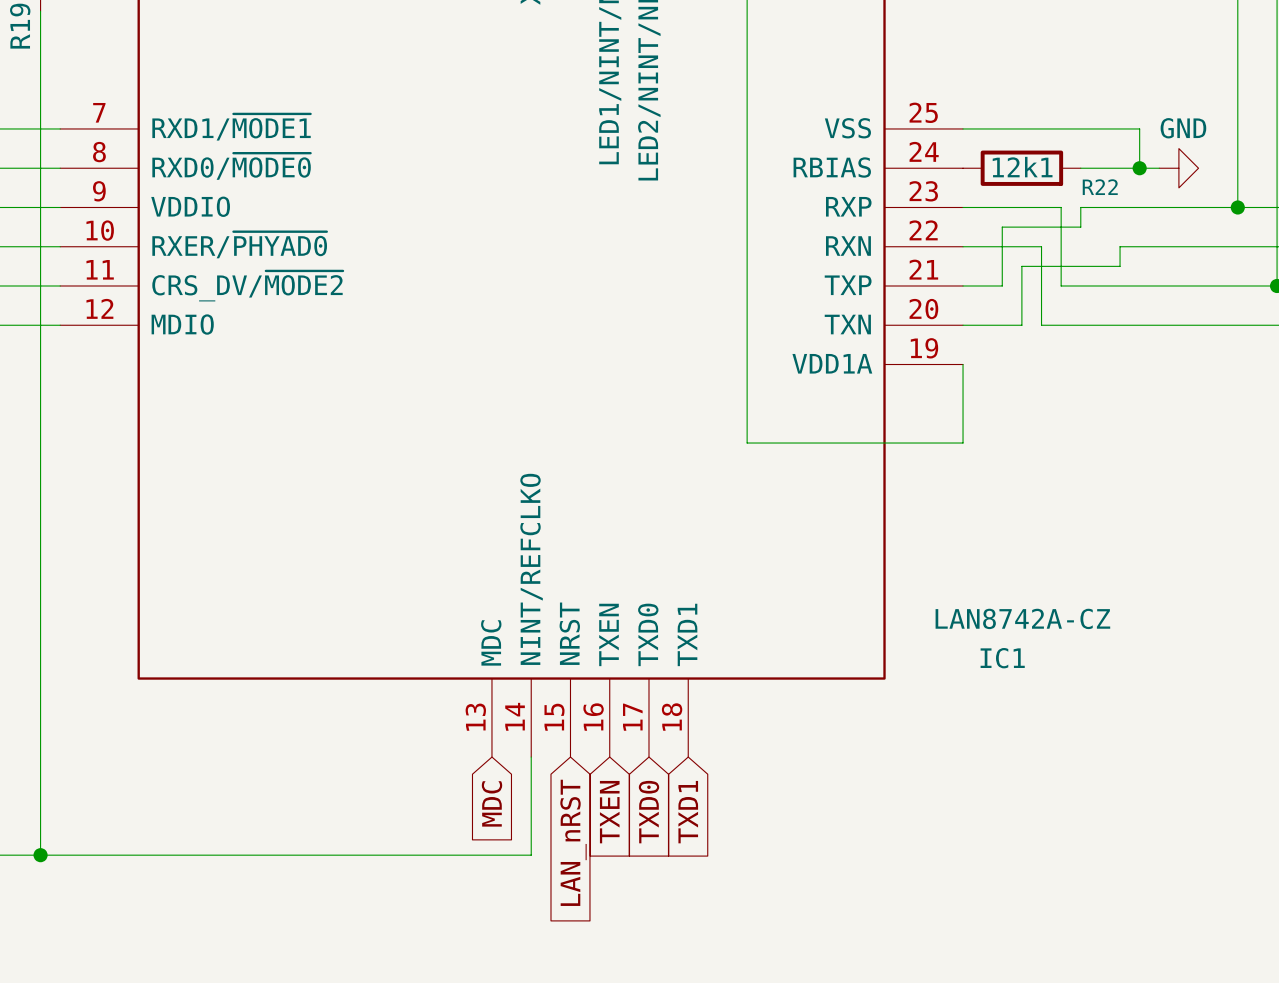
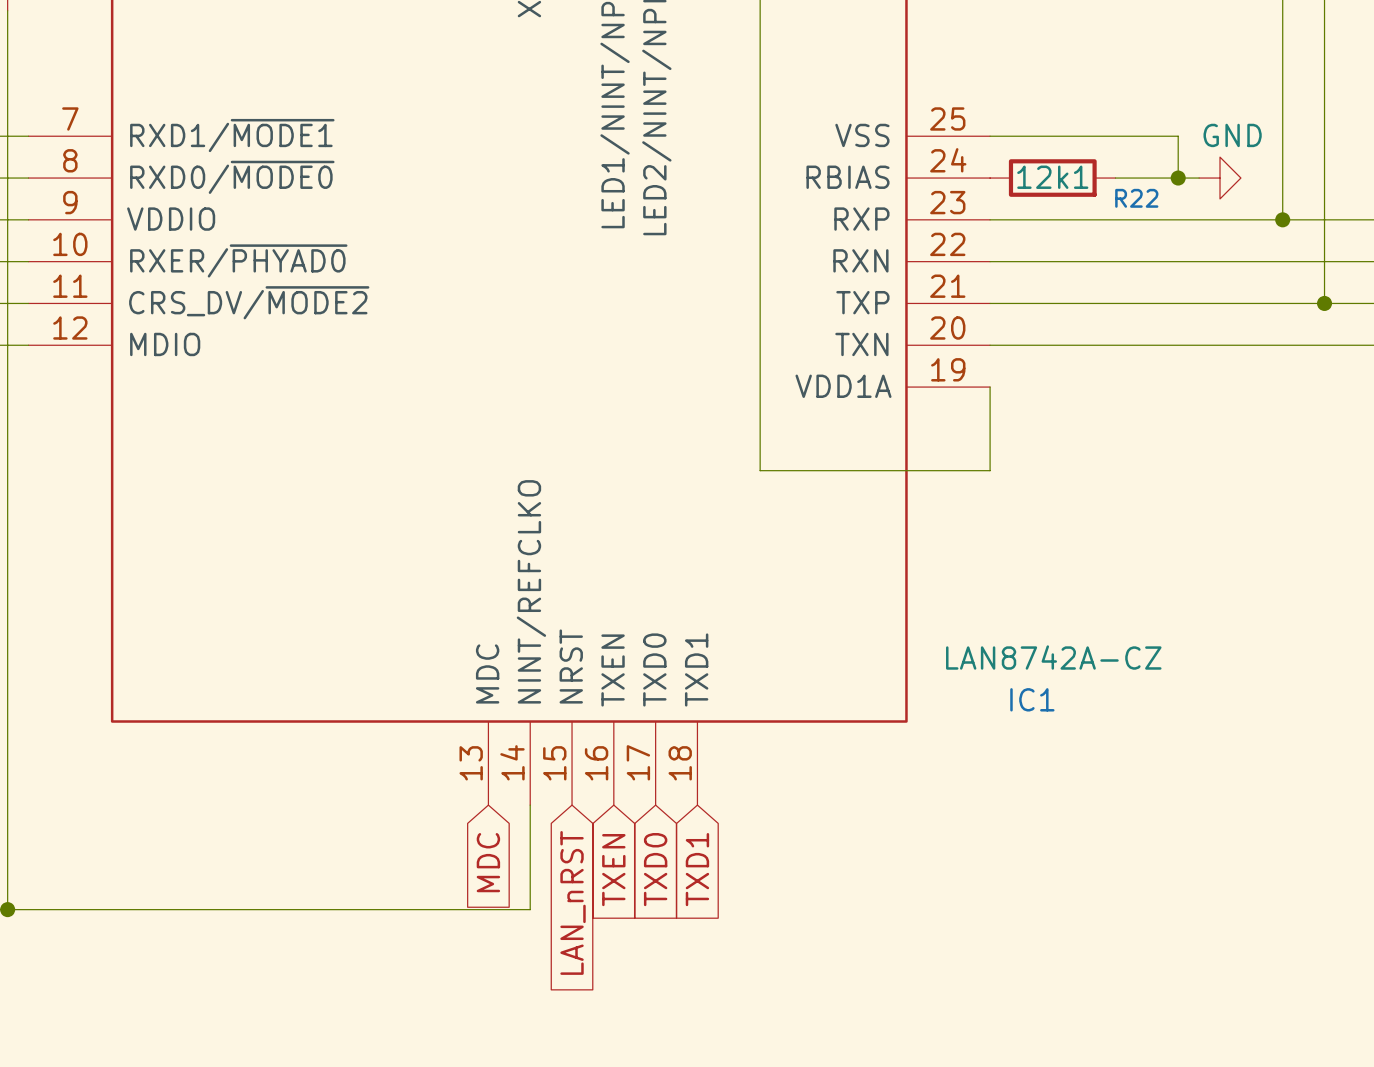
wire: (1061, 207) (1061, 285) -> (1094, 219) (1115, 219)
wire: (1080, 207) (1080, 227) (1002, 227) (1002, 285) -> (1094, 303) (1031, 303)
wire: (1041, 246) (1041, 325) -> (1052, 345) (1073, 345)
wire: (1120, 246) (1120, 266) (1021, 266) (1021, 325) -> (1157, 261) (1073, 261)

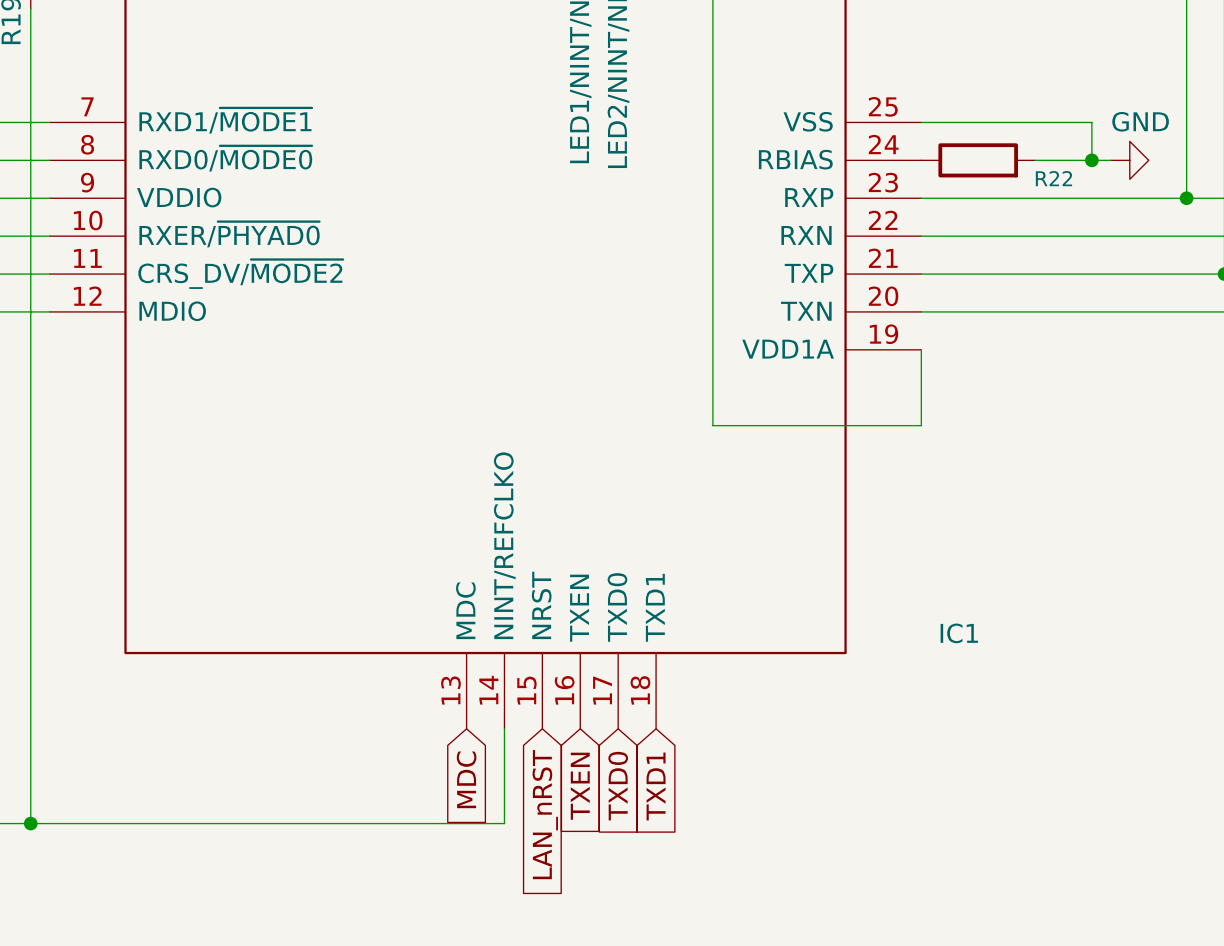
R22 value: 12k1 (1052, 177) -> none
IC1 value: LAN8742A-CZ (1053, 657) -> none

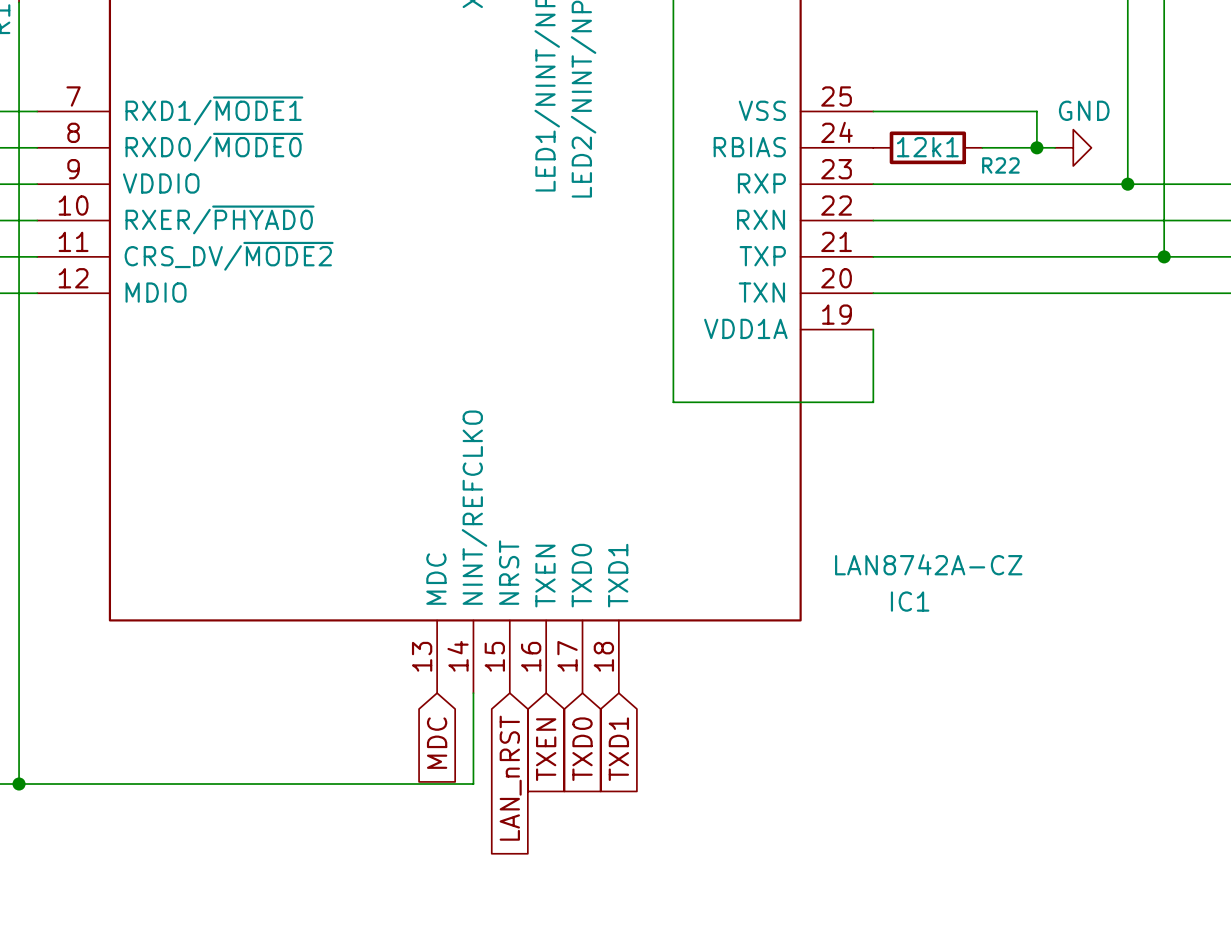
R22 value: none -> 12k1 (927, 147)
IC1 value: none -> LAN8742A-CZ (928, 564)

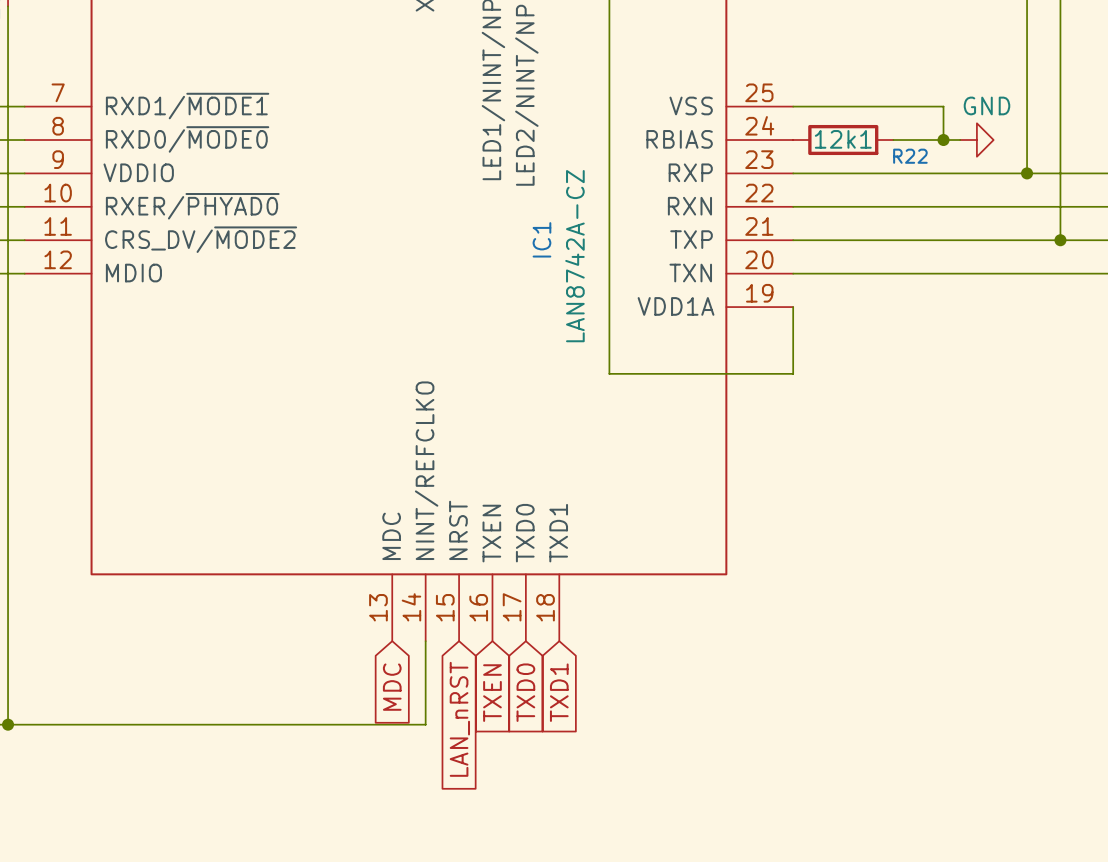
IC1 value rotation: 0° (928, 564) -> 90° counterclockwise (574, 256)
IC1 value position: LAN8742A-CZ (928, 564) -> LAN8742A-CZ (574, 256)
IC1 name rotation: 0° (910, 601) -> 90° counterclockwise (541, 239)
IC1 name position: IC1 (910, 601) -> IC1 (541, 239)

